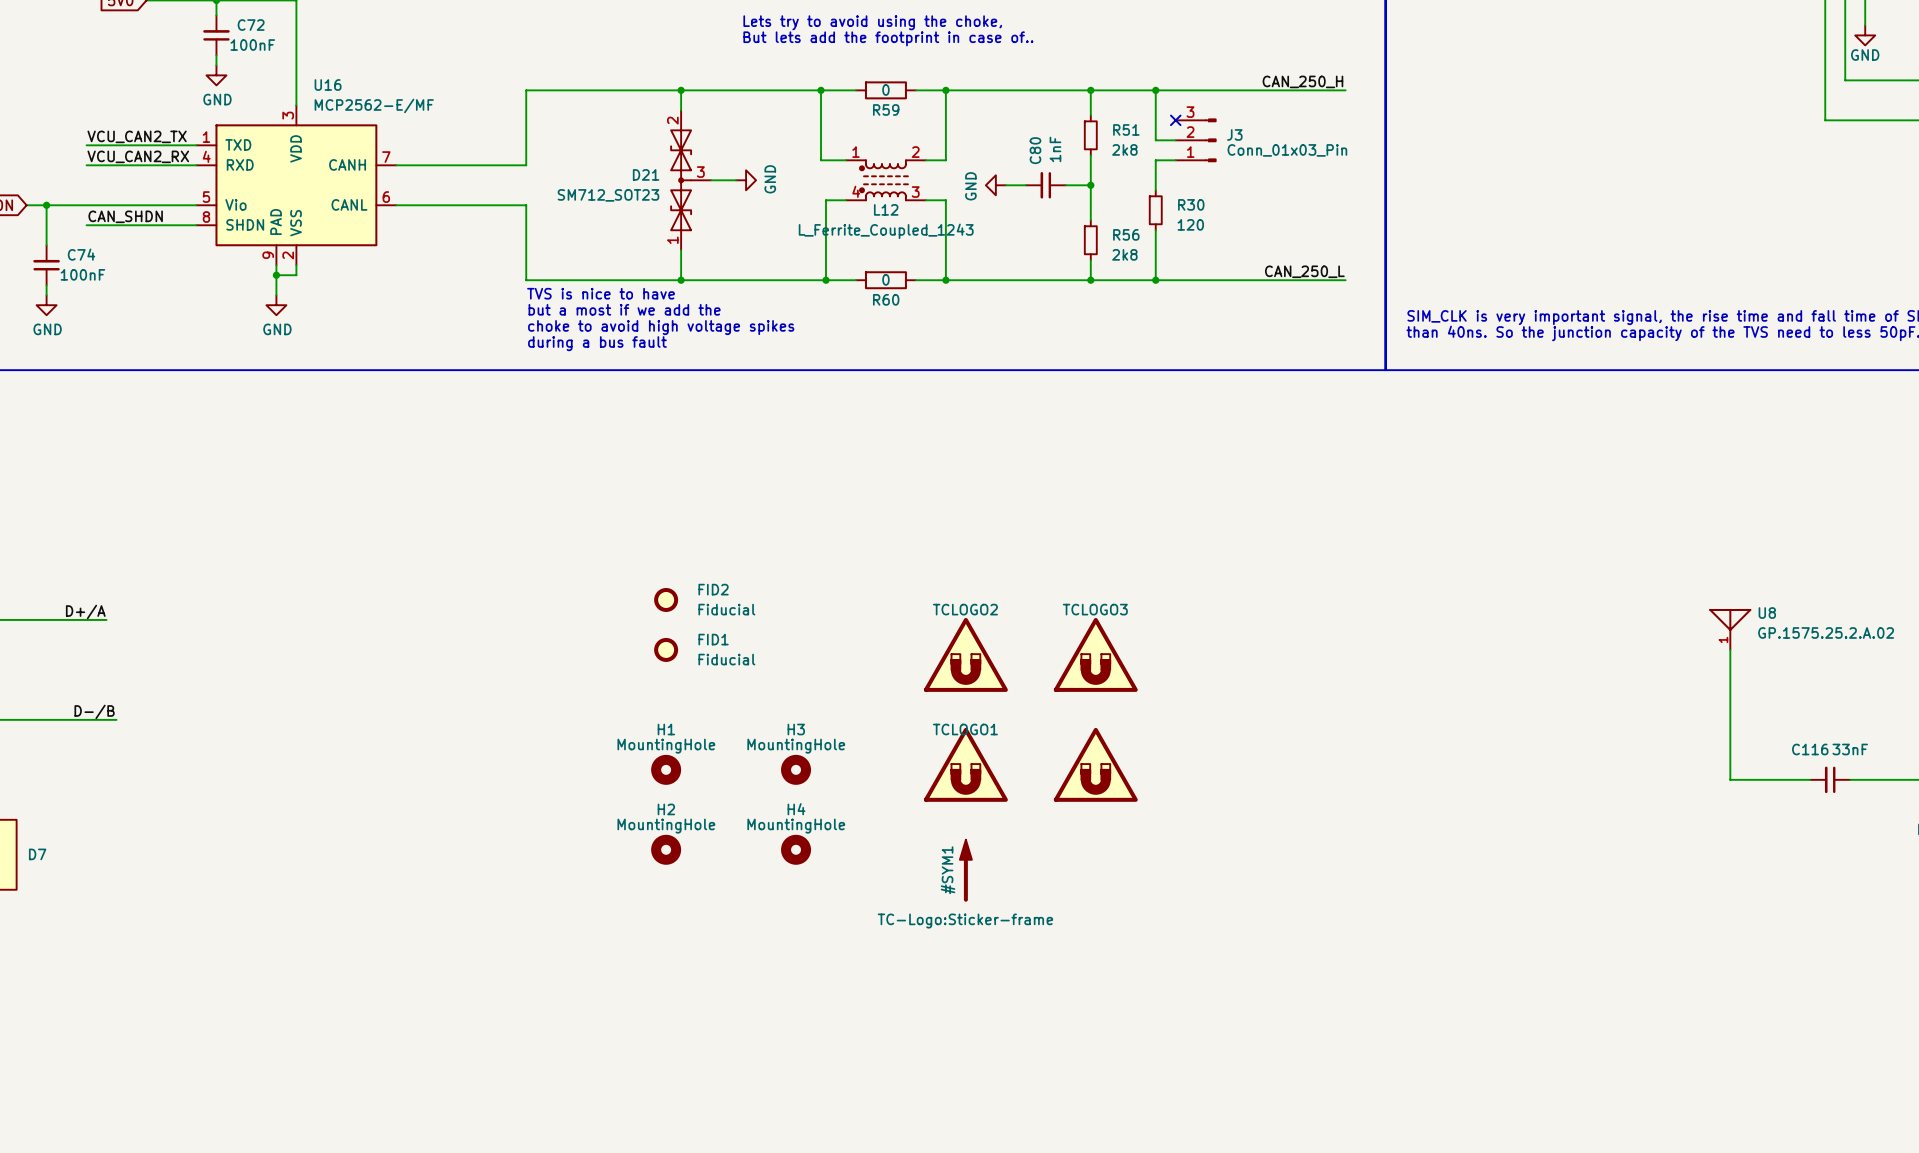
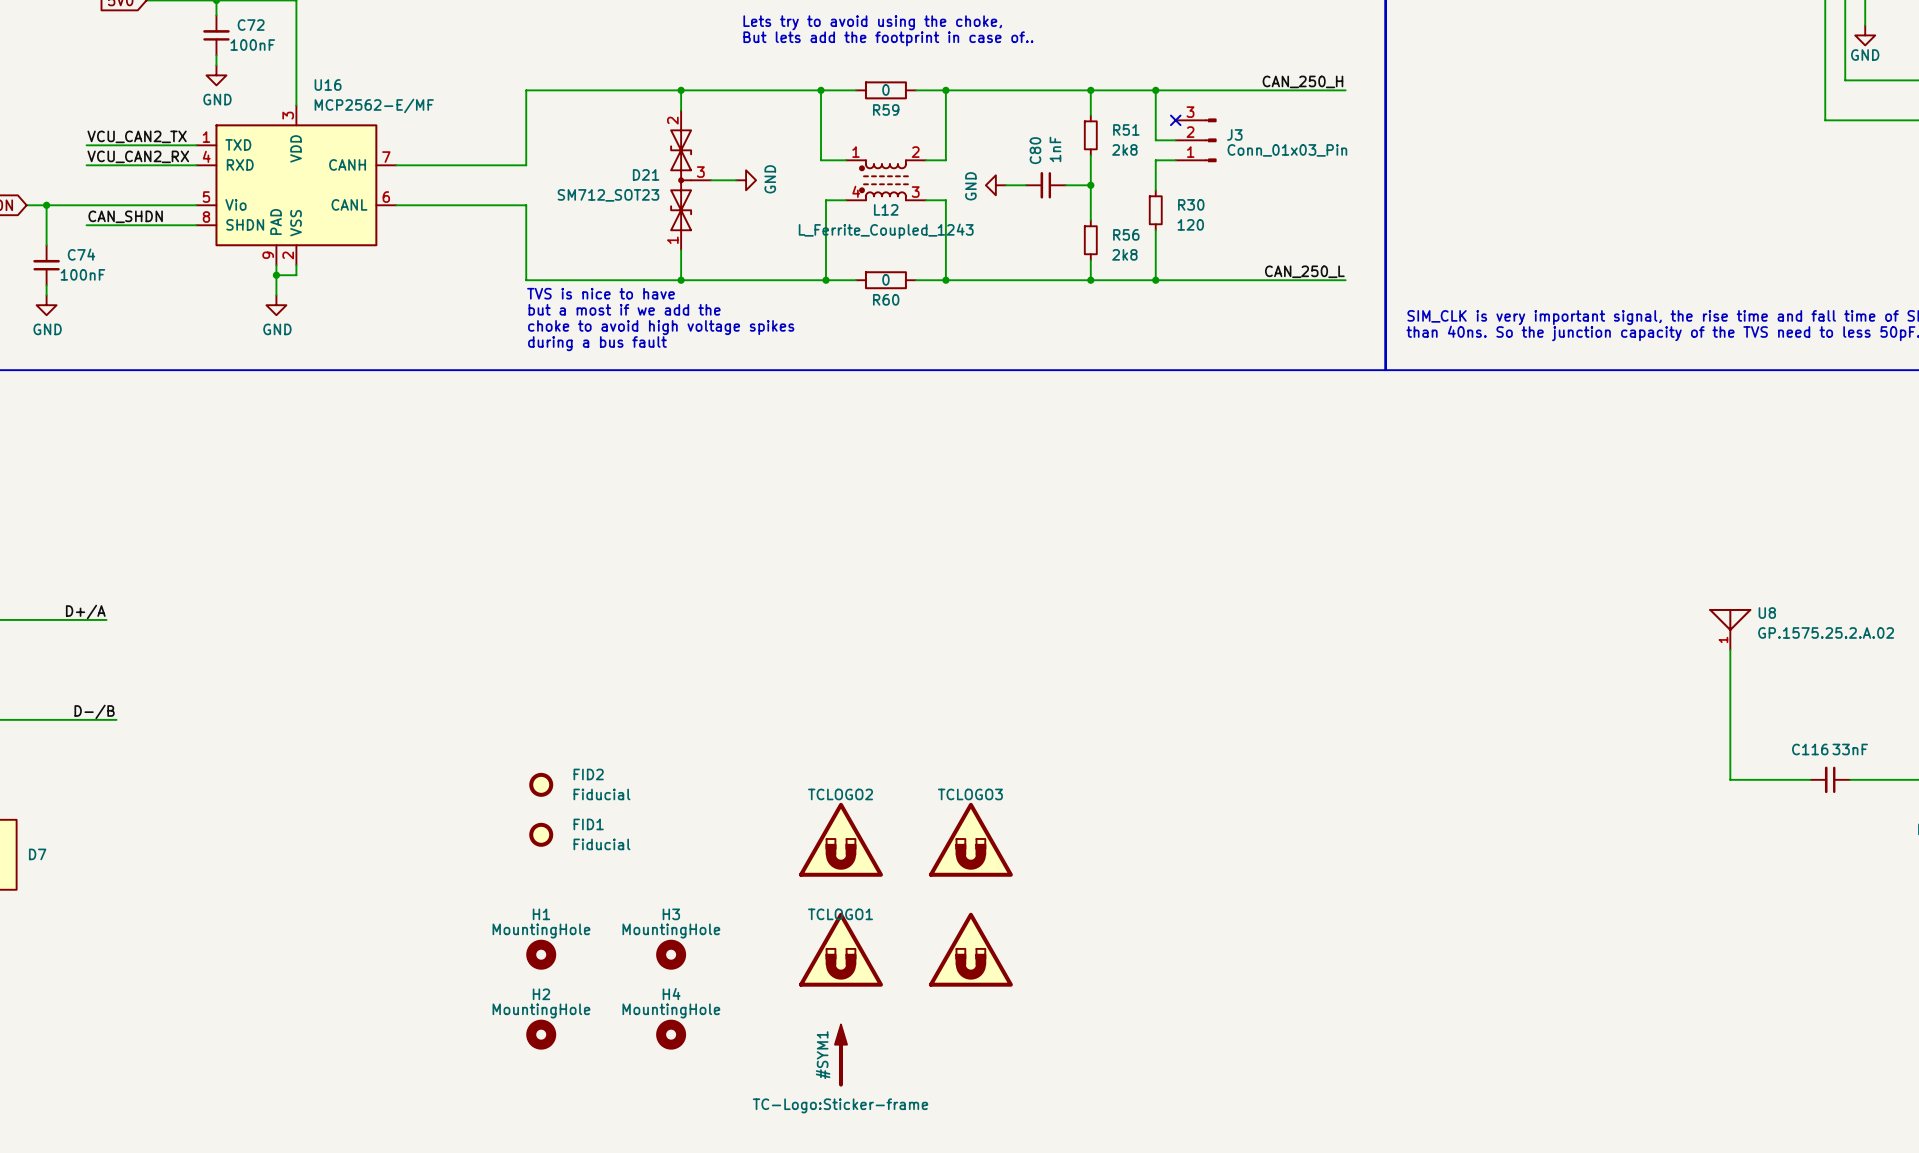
FID2 position: (666, 599) -> (541, 784)
FID1 position: (666, 649) -> (541, 834)
TCLOGO2 position: (965, 654) -> (840, 839)
TCLOGO3 position: (1095, 654) -> (970, 839)
TCLOGO1 position: (965, 764) -> (840, 949)
part: (1095, 764) -> none
H1 position: (666, 769) -> (541, 954)
H3 position: (796, 769) -> (671, 954)
H2 position: (666, 849) -> (541, 1034)
H4 position: (796, 849) -> (671, 1034)
#SYM1 position: (965, 870) -> (840, 1055)
part: none -> (970, 949)

